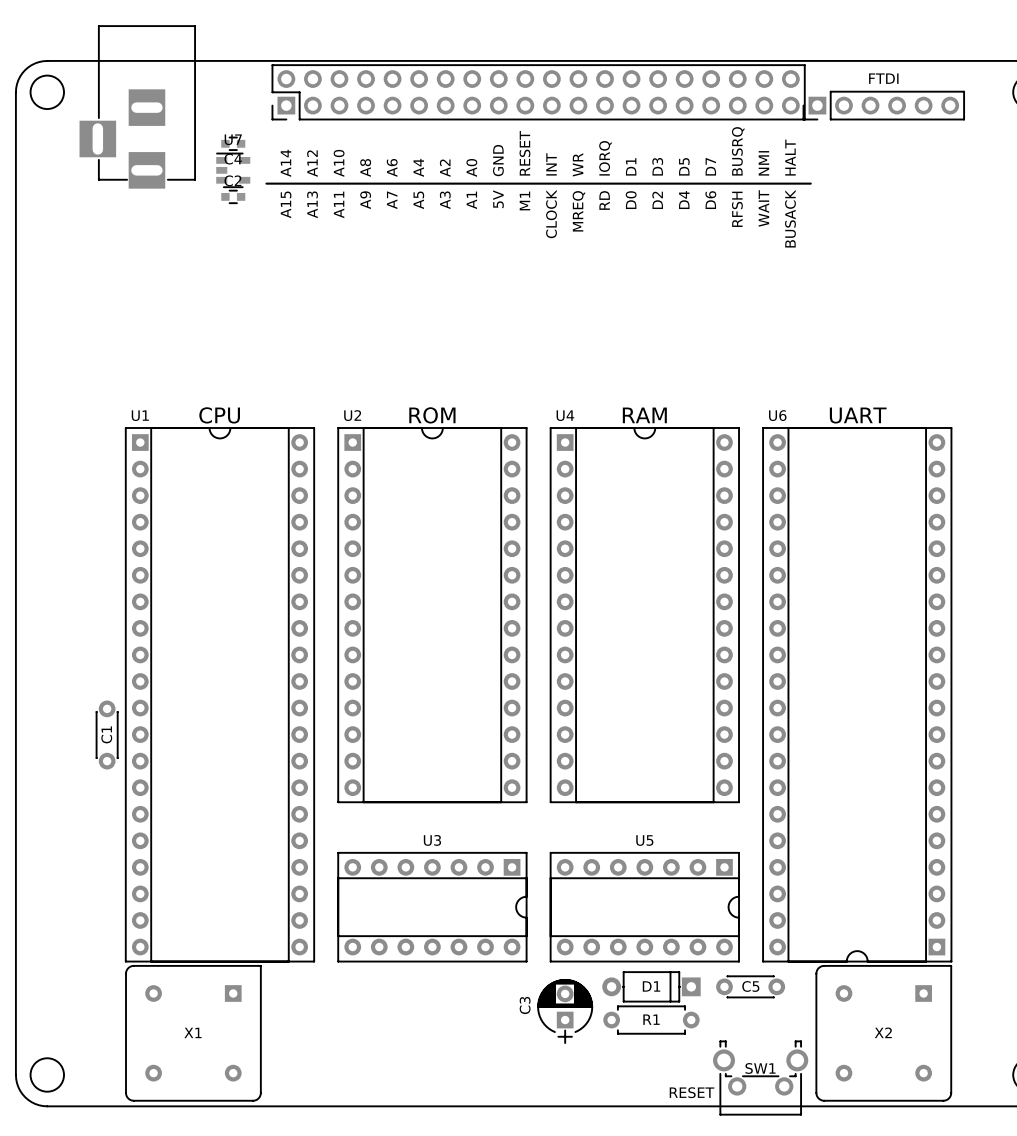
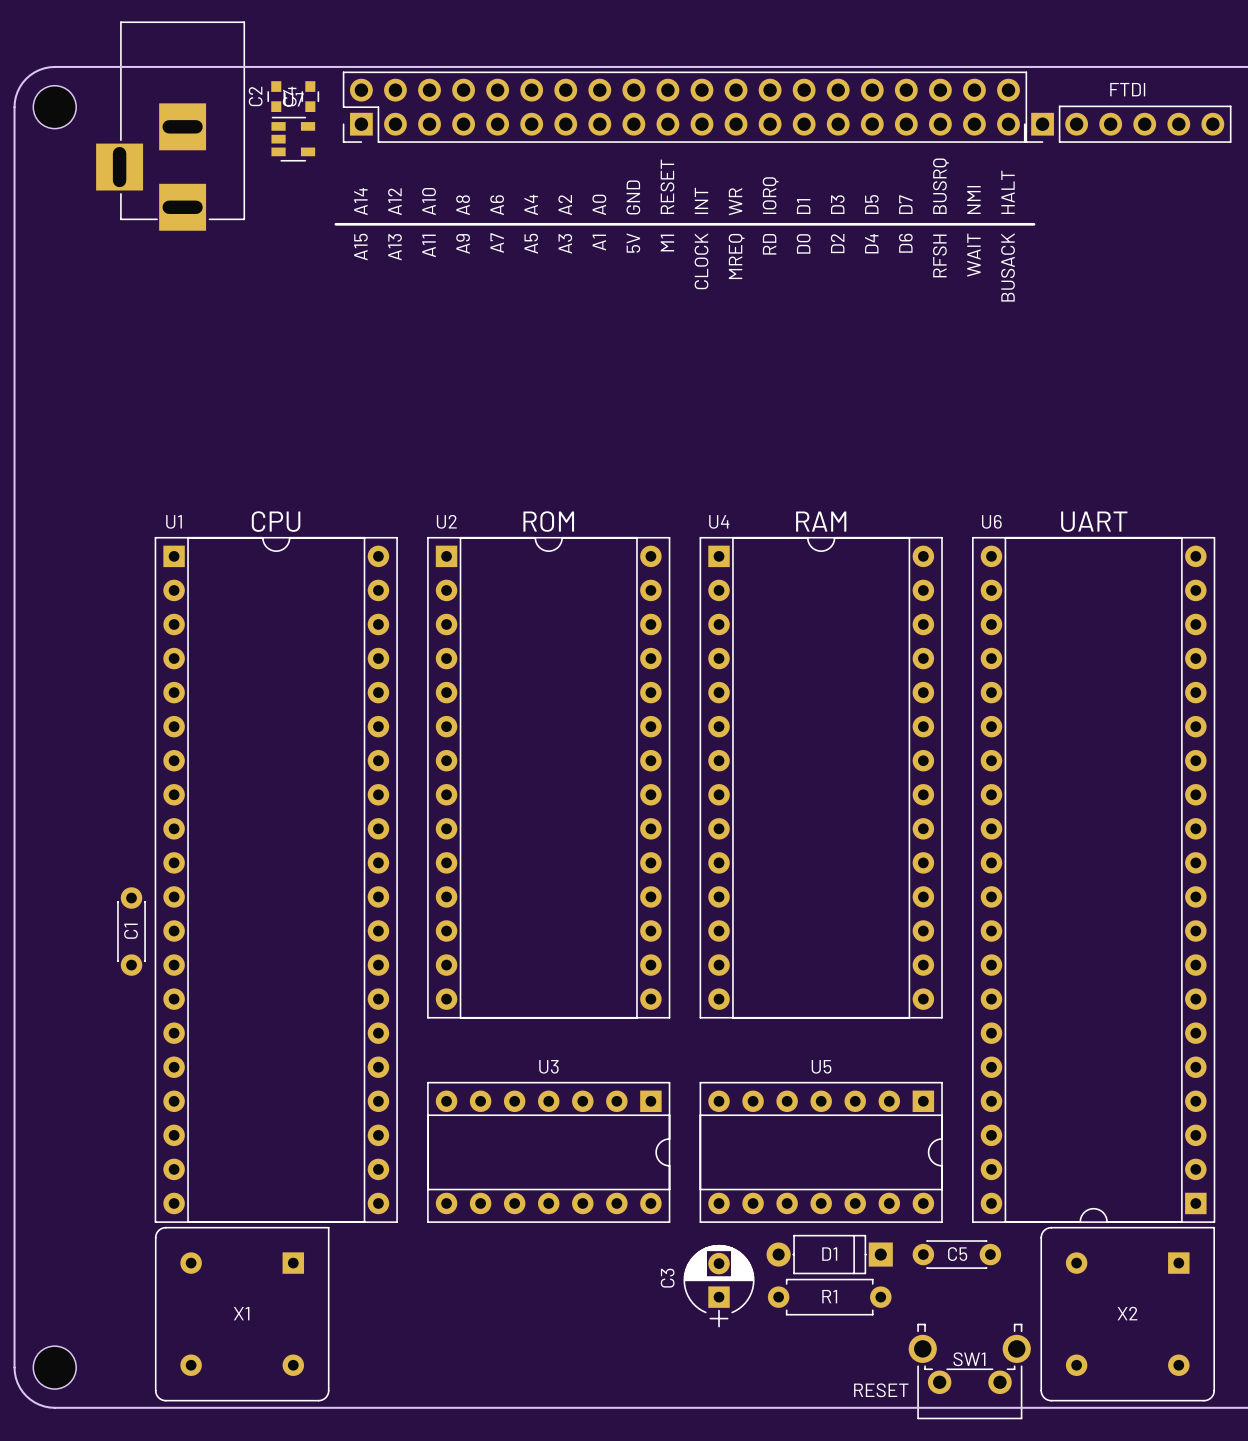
C4 rotation: 0° (233, 143) -> 90° clockwise (310, 96)
C4 position: (233, 143) -> (310, 96)
U7 position: (233, 170) -> (293, 139)
C2 name position: C2 (232, 180) -> C2 (255, 96)
C2 rotation: 0° (233, 196) -> 90° clockwise (276, 96)
C2 position: (233, 196) -> (276, 96)

